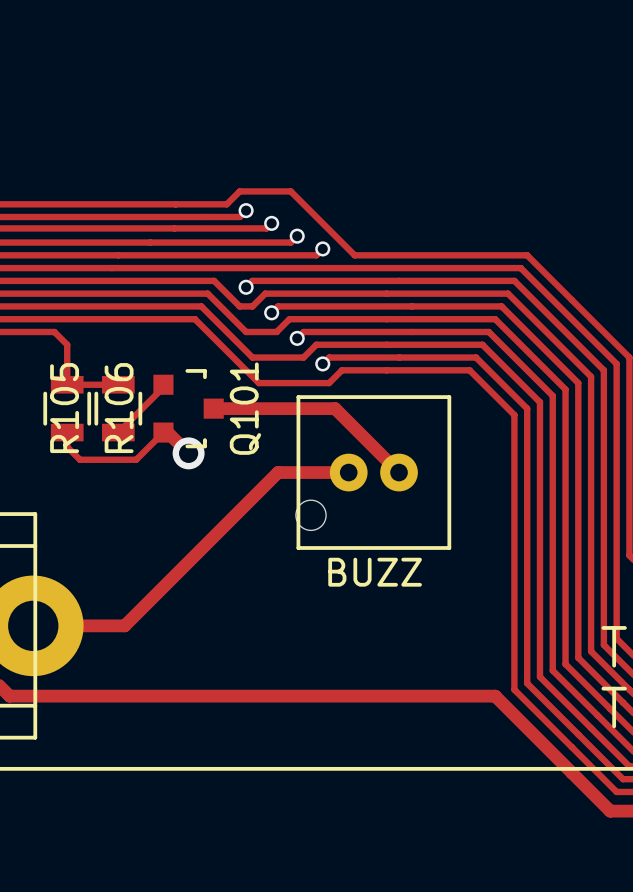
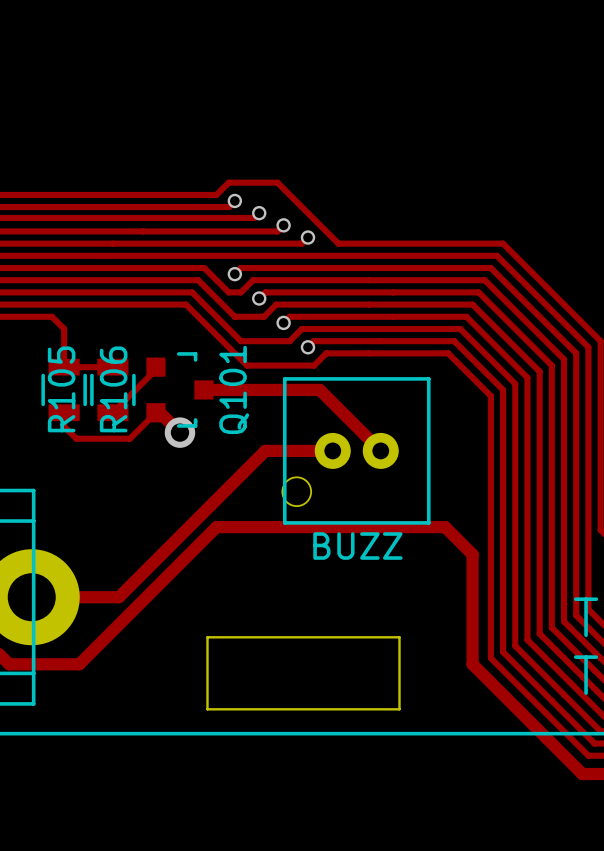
board edge: none -> (207, 637) (399, 637) (399, 709) (207, 709) (207, 637)
track: (83, 696) (495, 696) -> (79, 664) (216, 527) (445, 527) (472, 554) (472, 664)

